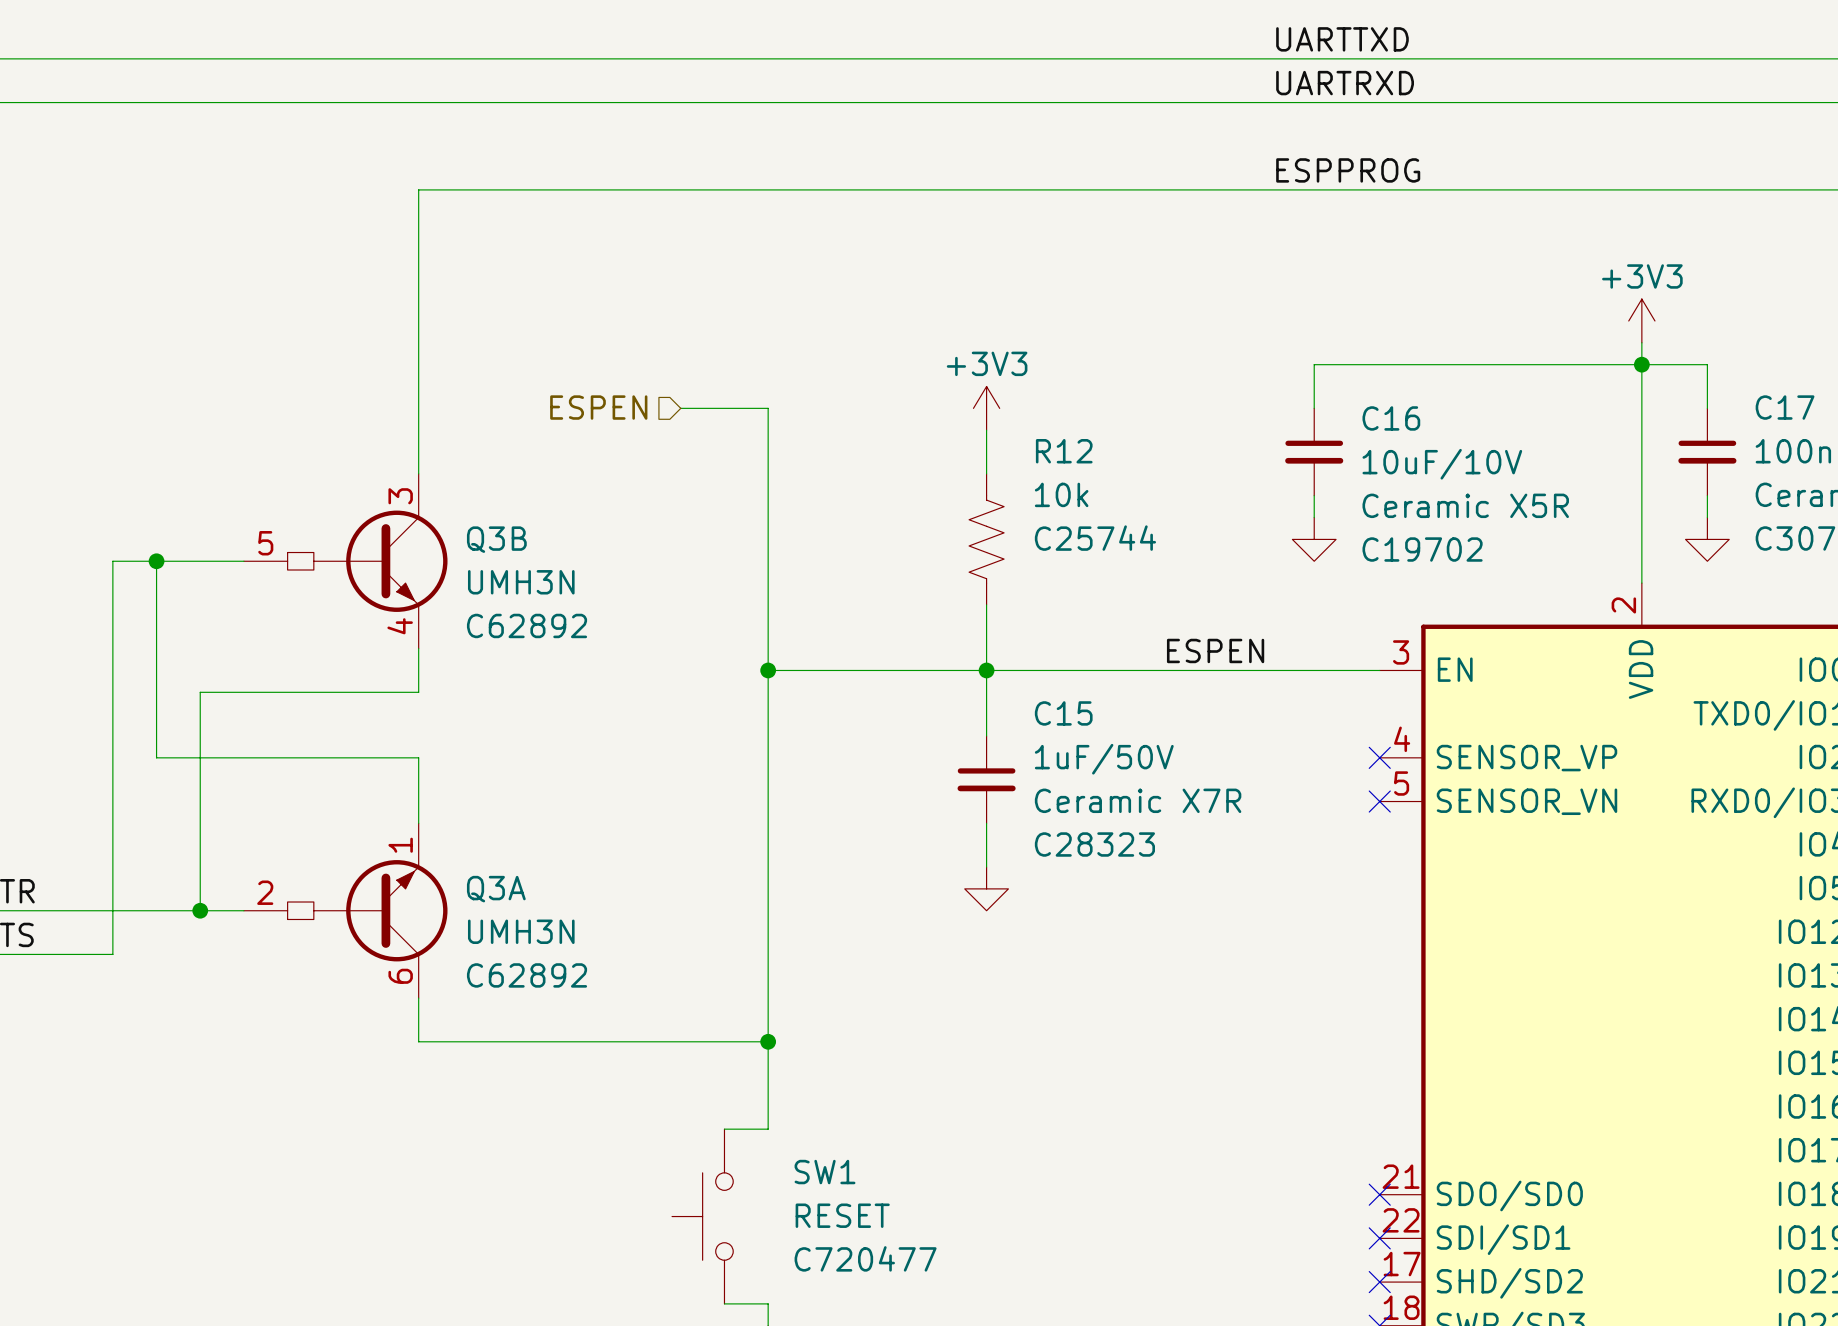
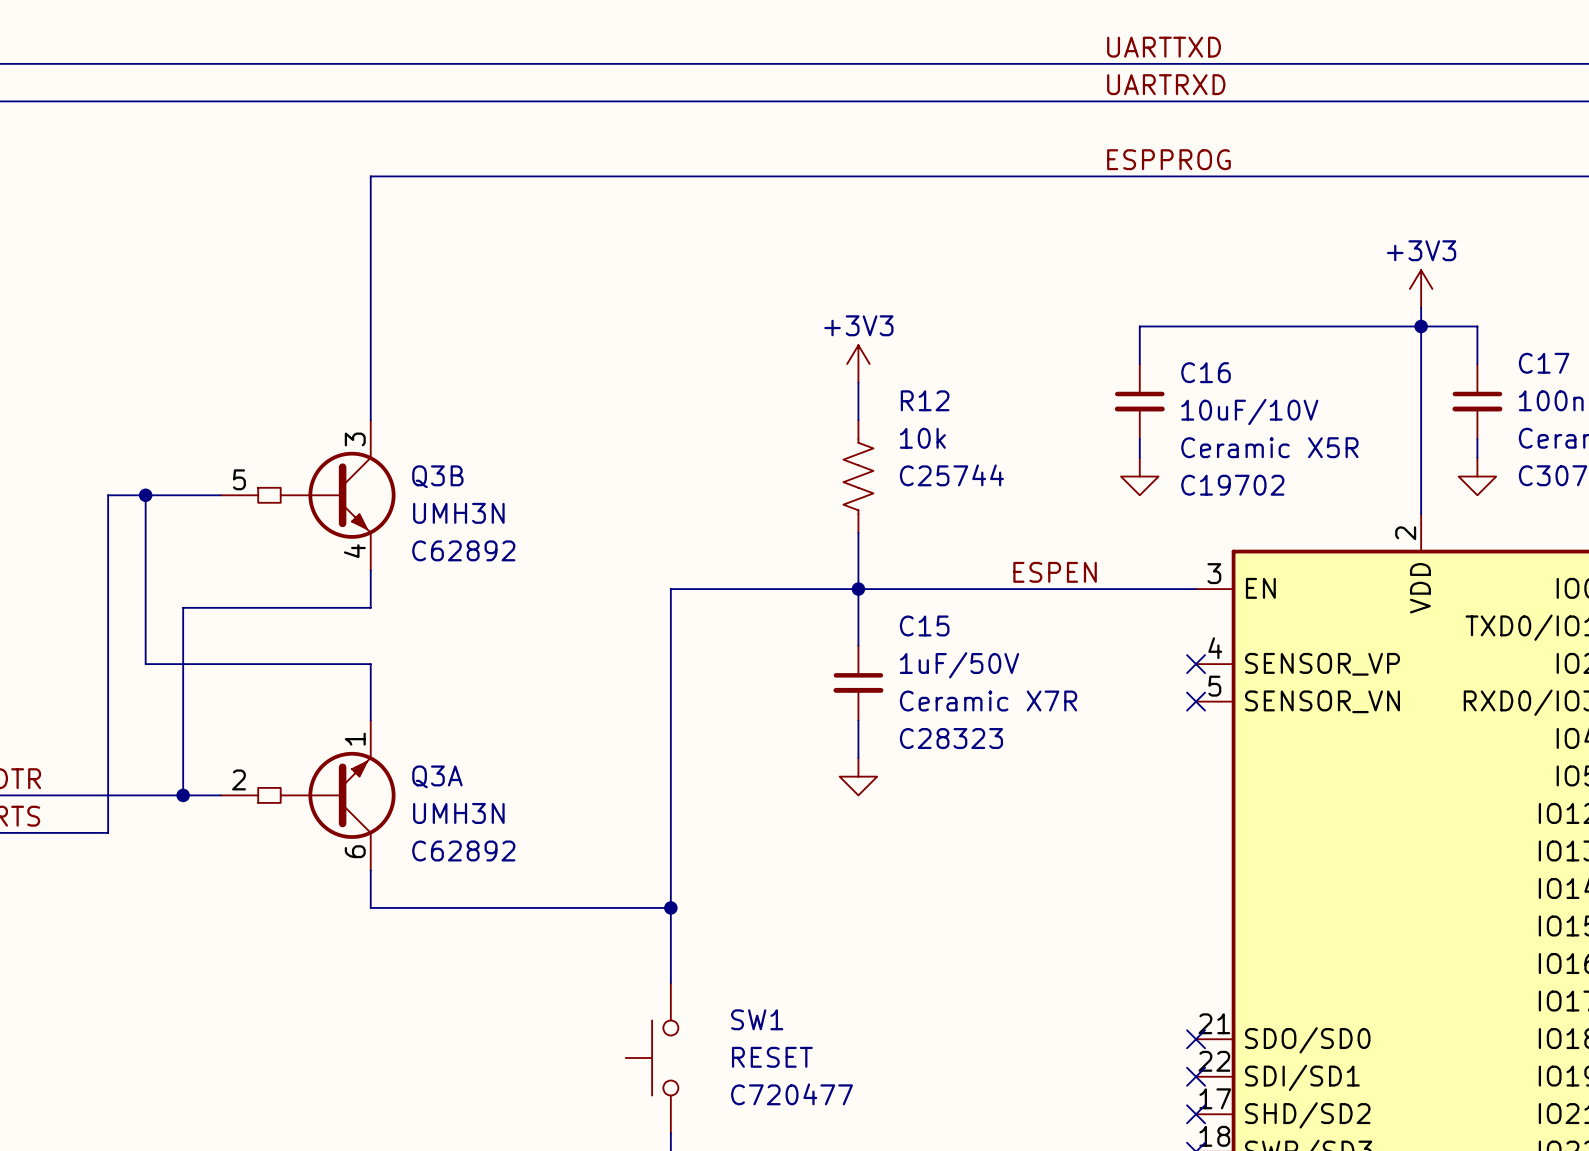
hierarchical label: ESPEN (598, 407) -> none
wire: (680, 408) (768, 408) (768, 670) -> none
junction: (768, 670) -> none
wire: (724, 1129) (768, 1129) -> none
SW1 position: (702, 1216) -> (652, 1058)
wire: (724, 1303) (768, 1303) -> none

